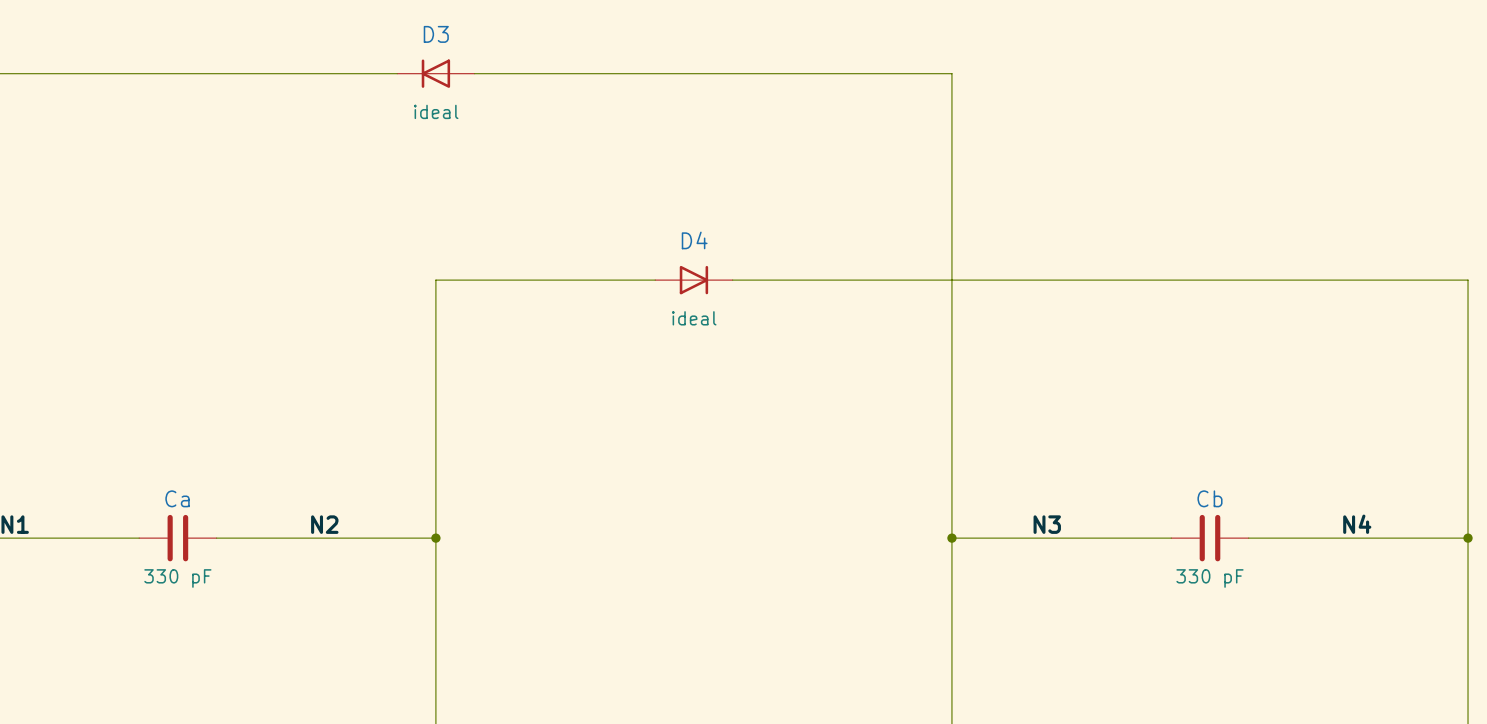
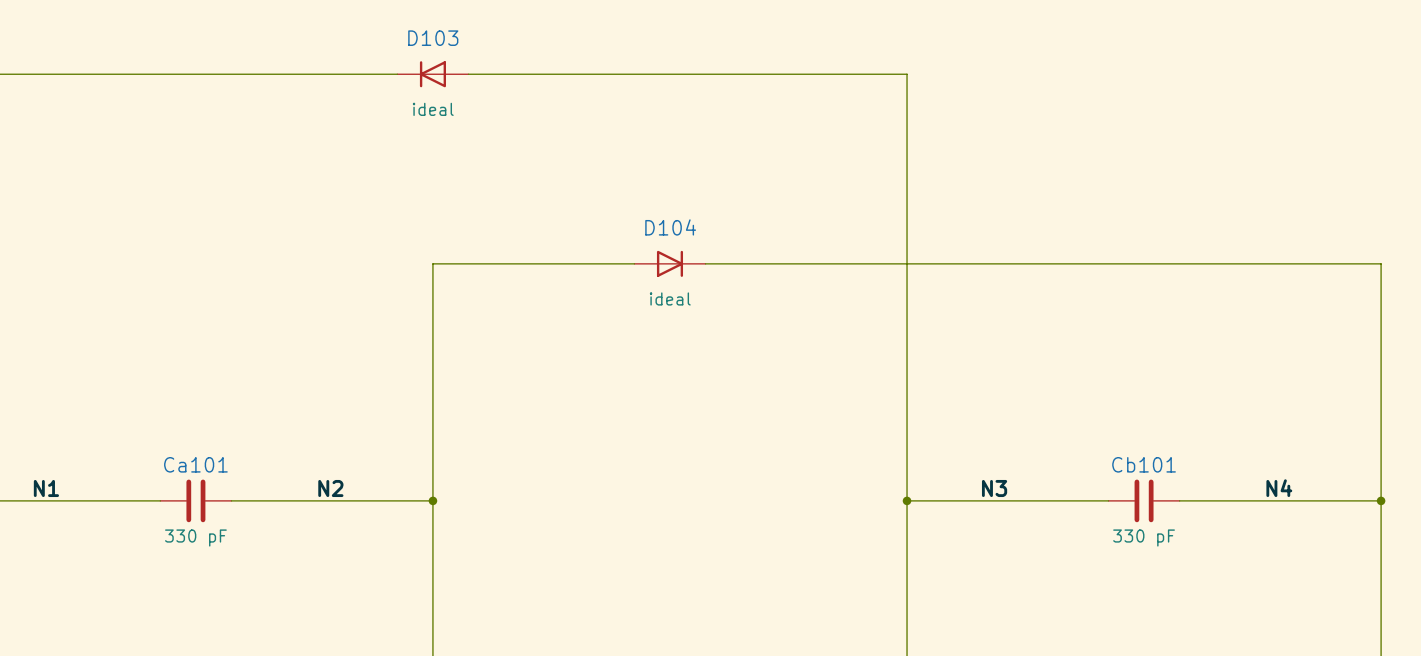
D3 name: D3 (436, 34) -> D103 (433, 38)
D4 name: D4 (694, 240) -> D104 (670, 227)
Ca name: Ca (177, 498) -> Ca101 (195, 464)
Cb name: Cb (1209, 498) -> Cb101 (1144, 464)

